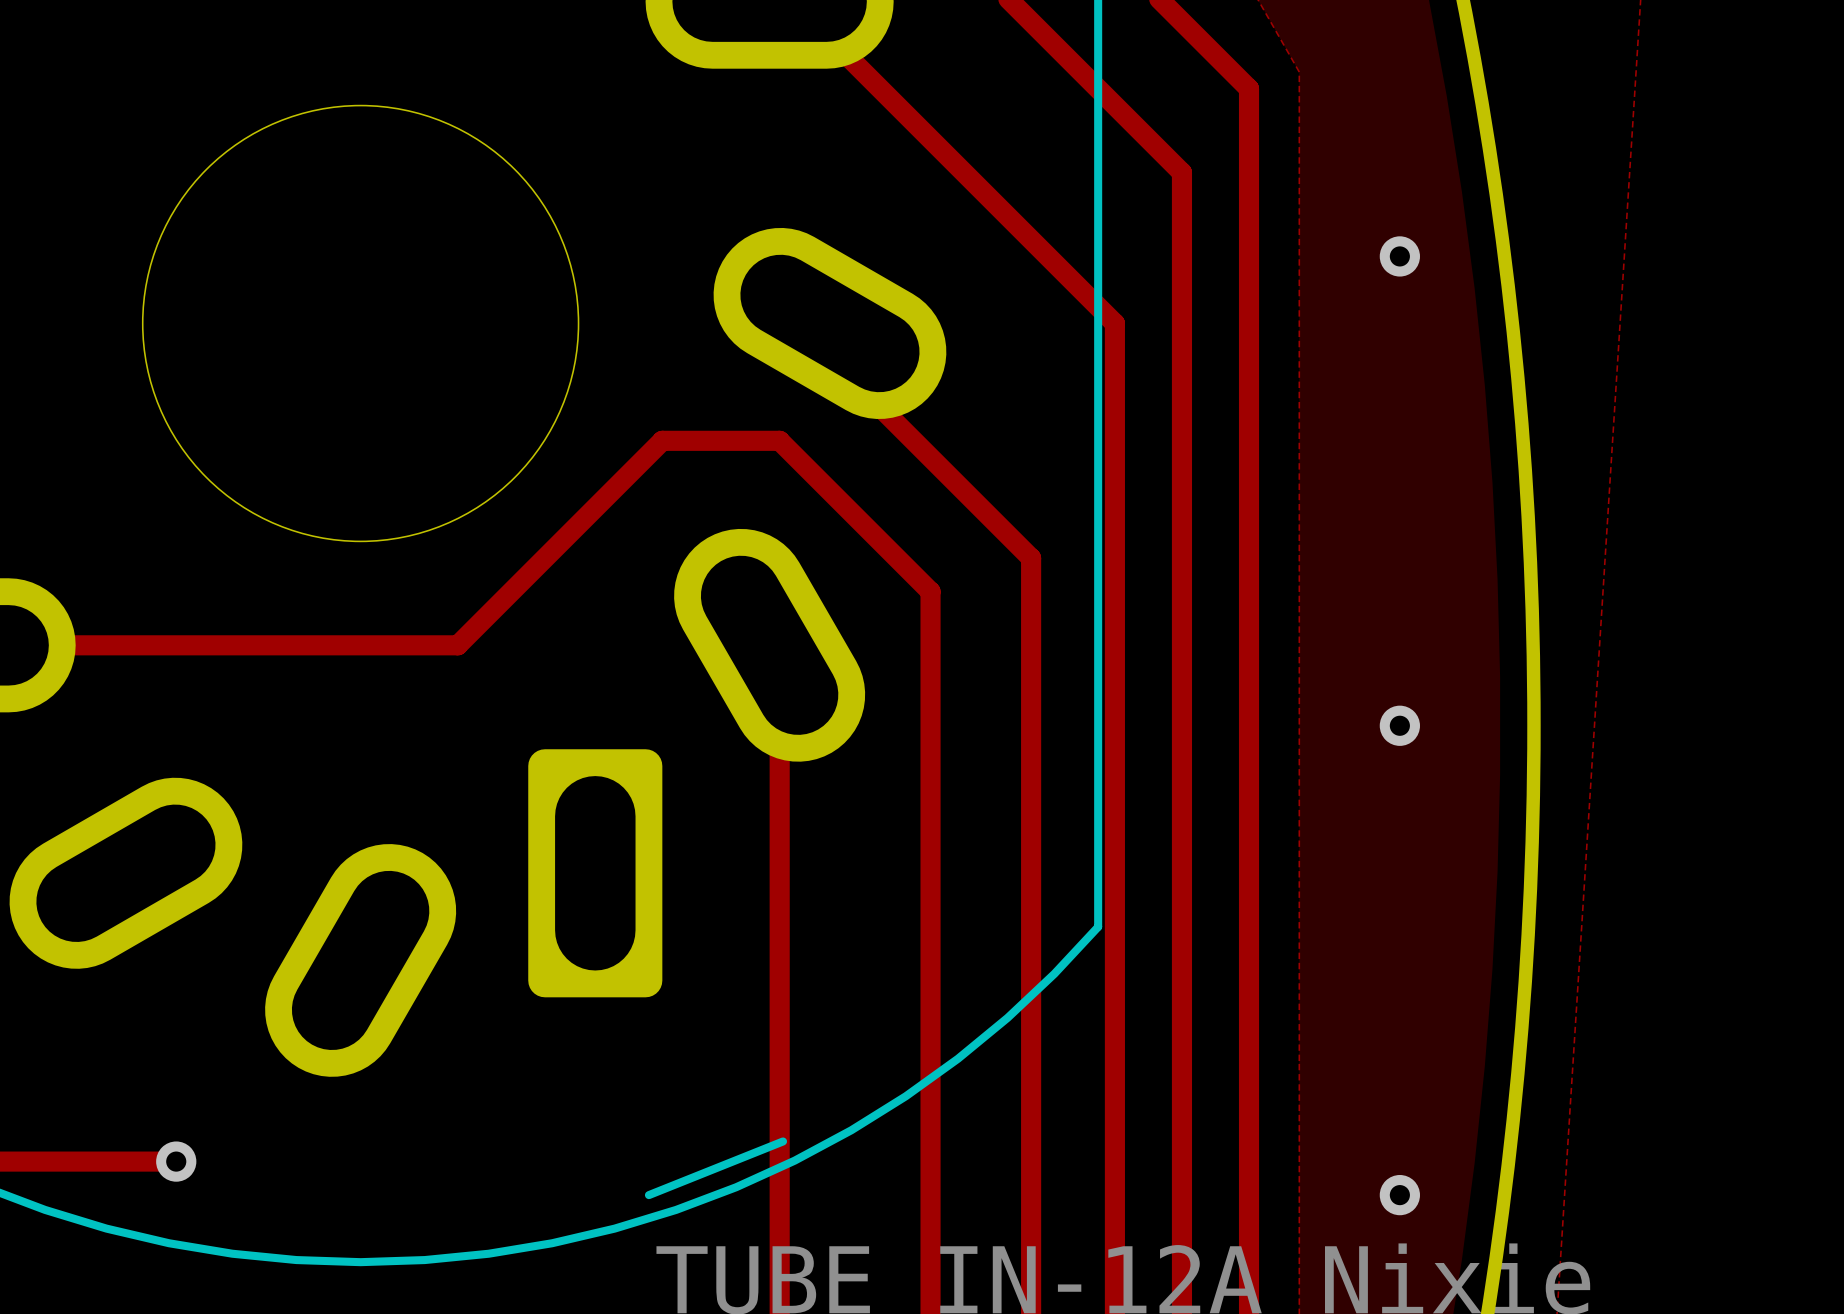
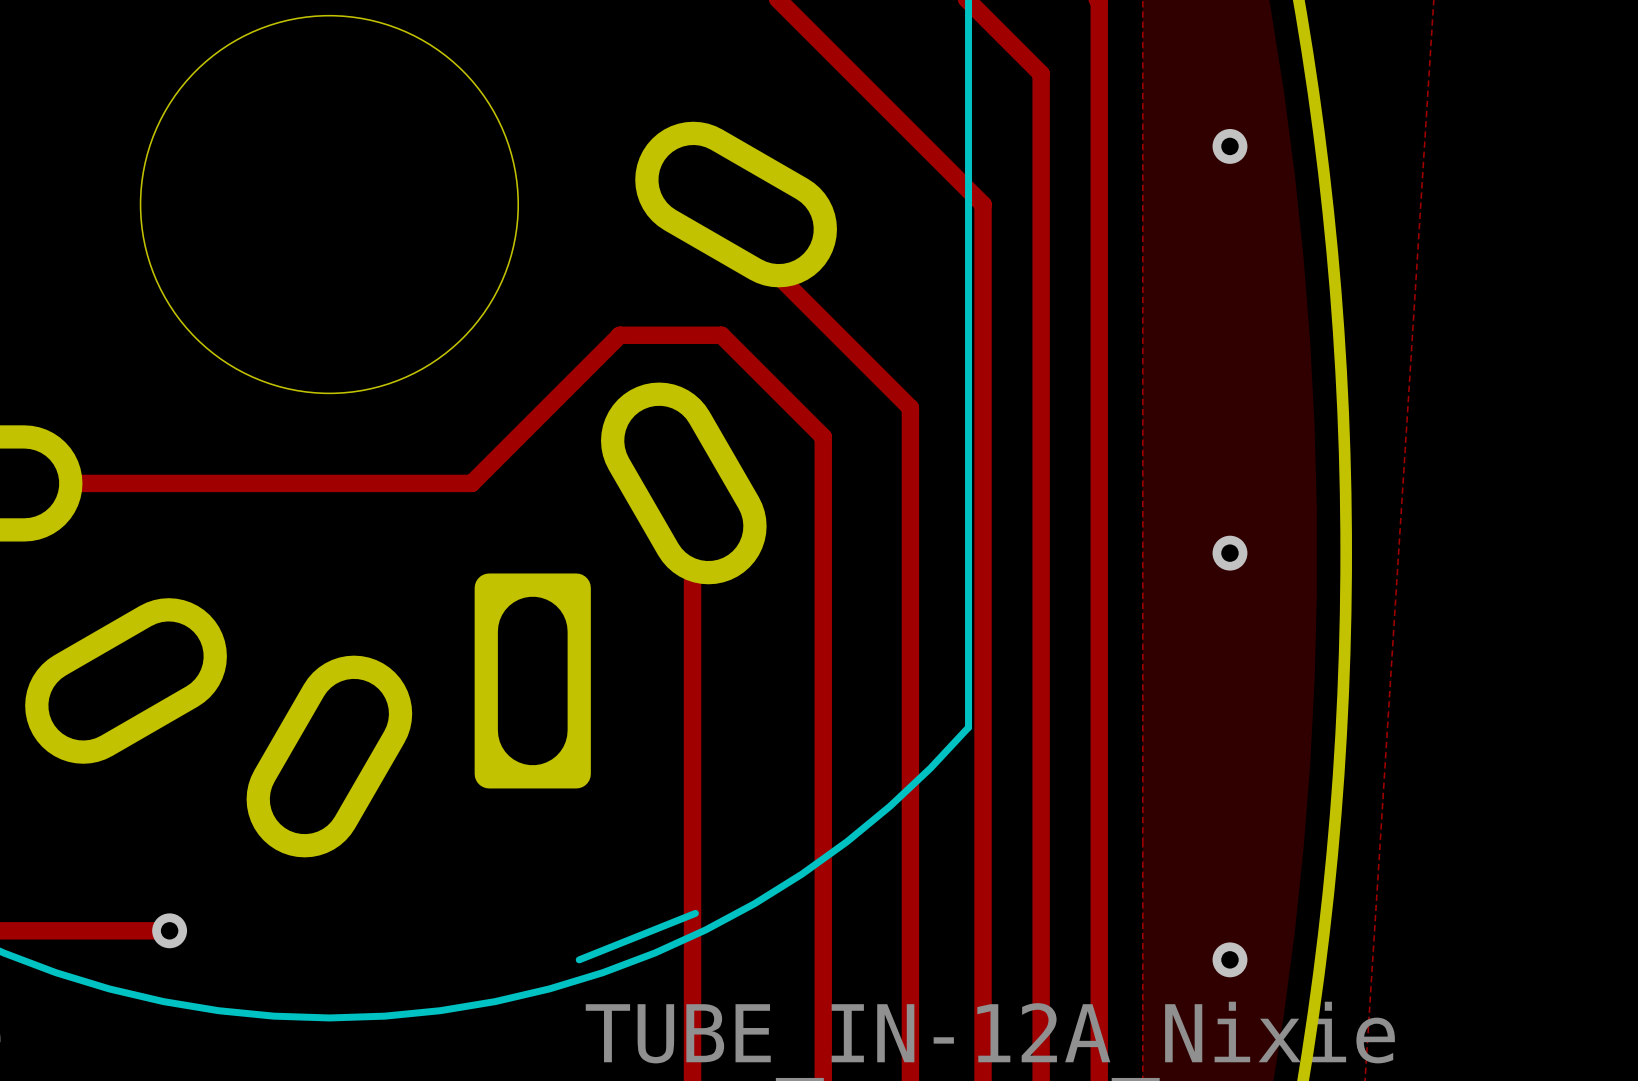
track: (813, 474) (779, 440) (662, 440) (457, 645) -> (721, 335) (619, 335) (471, 483) (413, 483)

